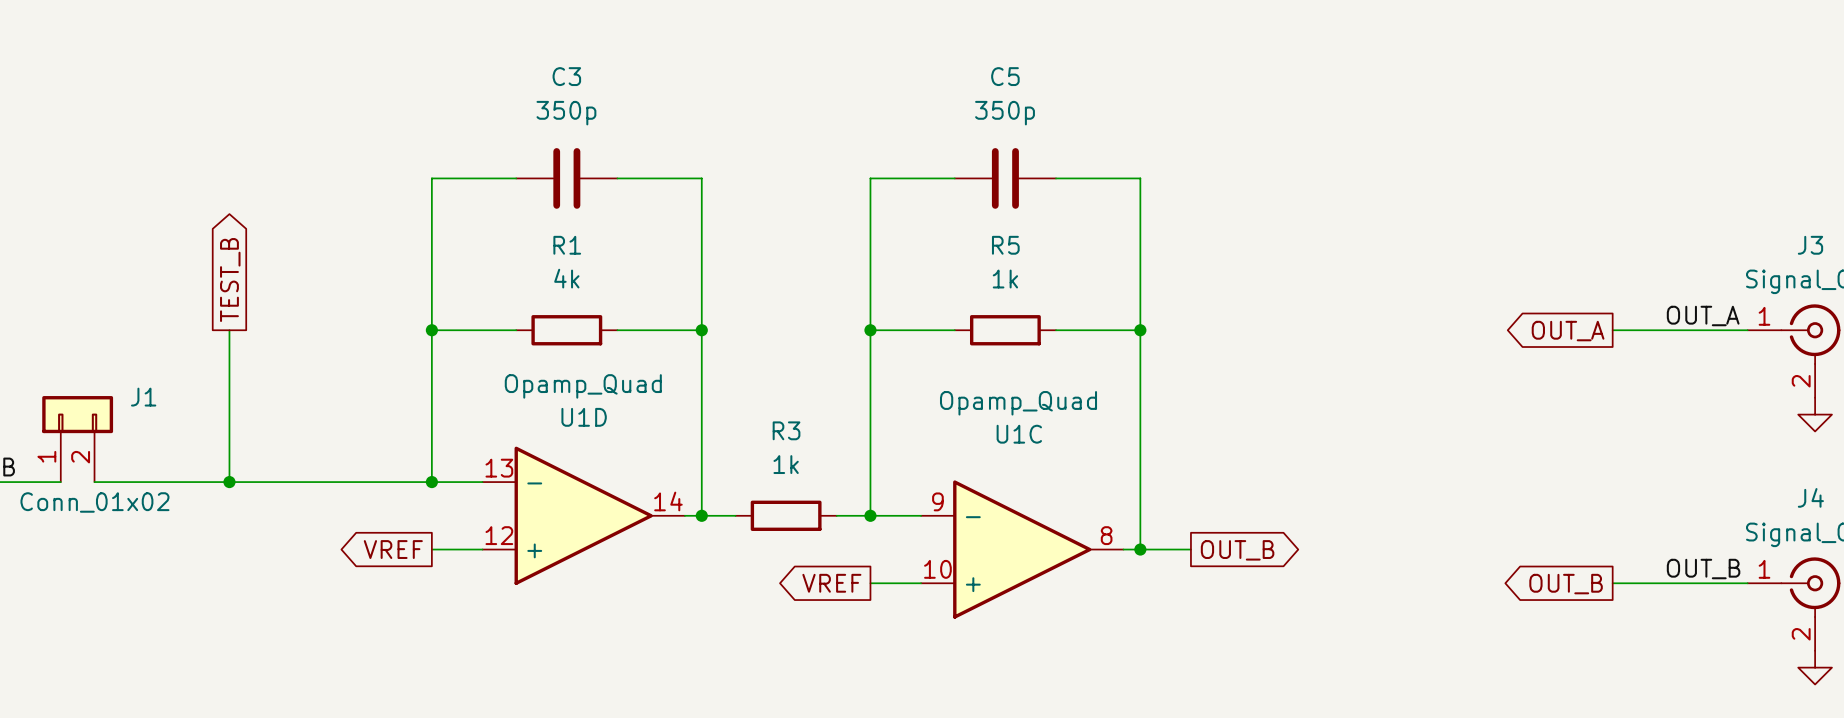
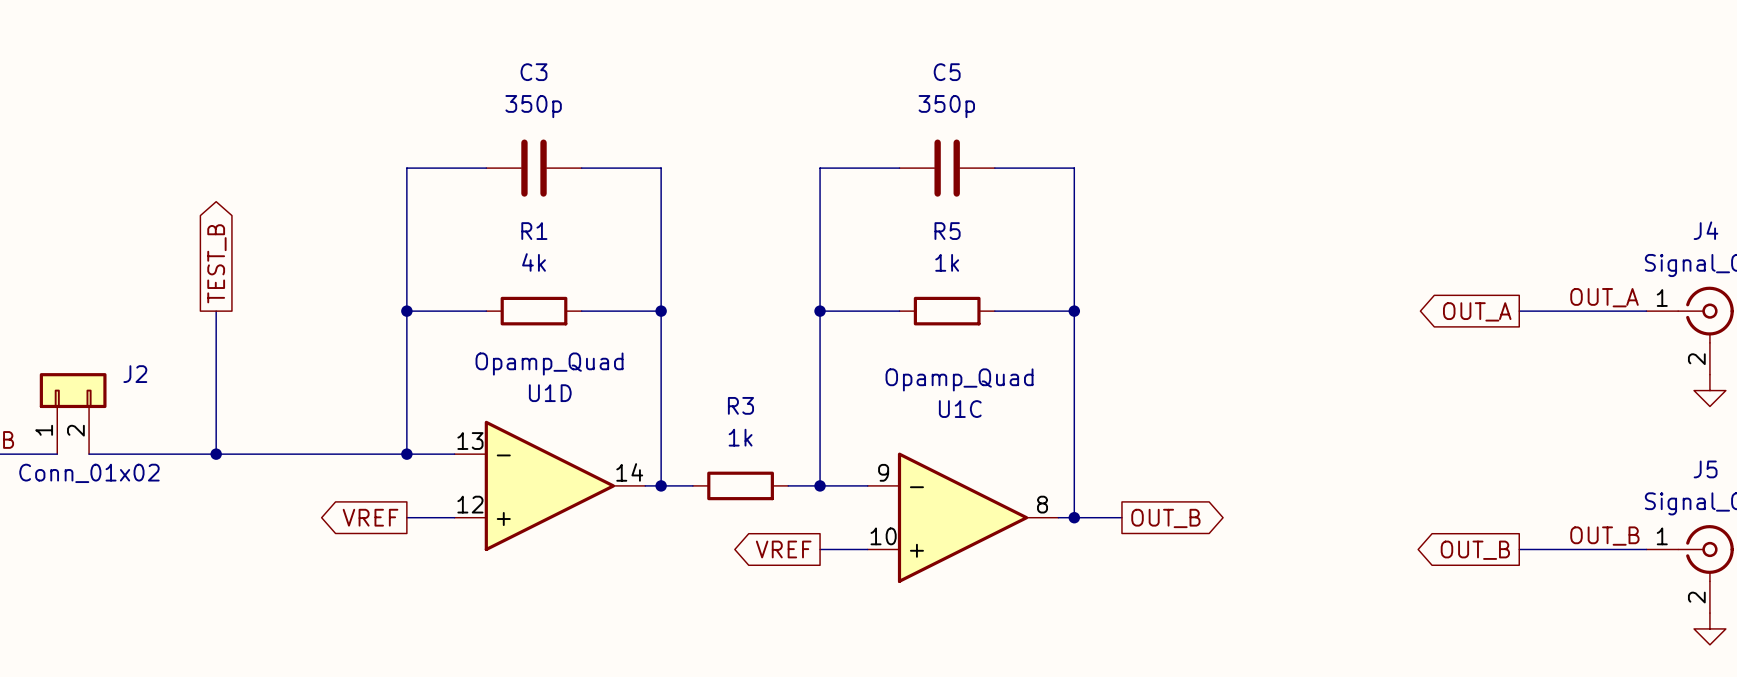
J3 name: J3 (1810, 245) -> J4 (1705, 230)
J1 name: J1 (143, 397) -> J2 (135, 374)
J4 name: J4 (1810, 497) -> J5 (1705, 469)

